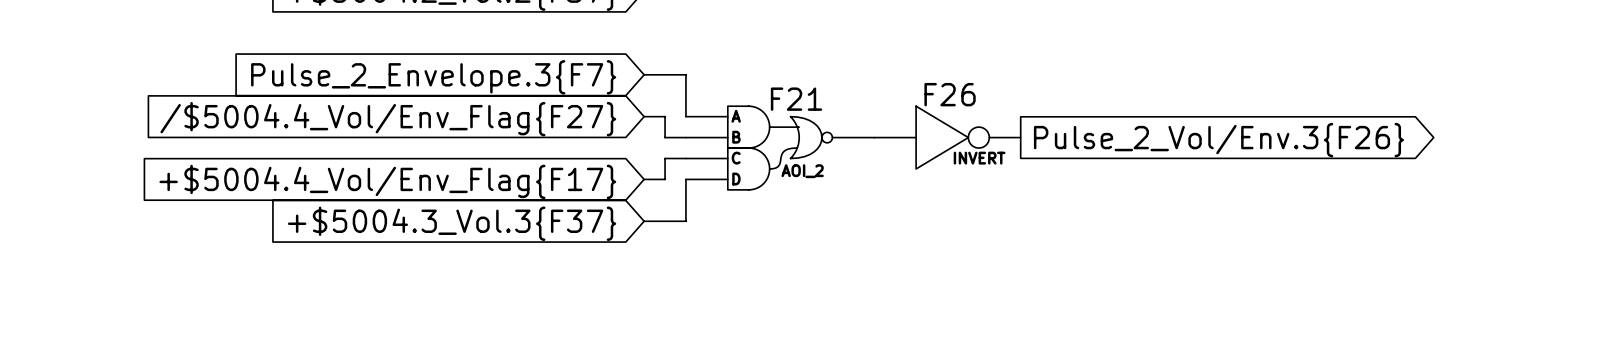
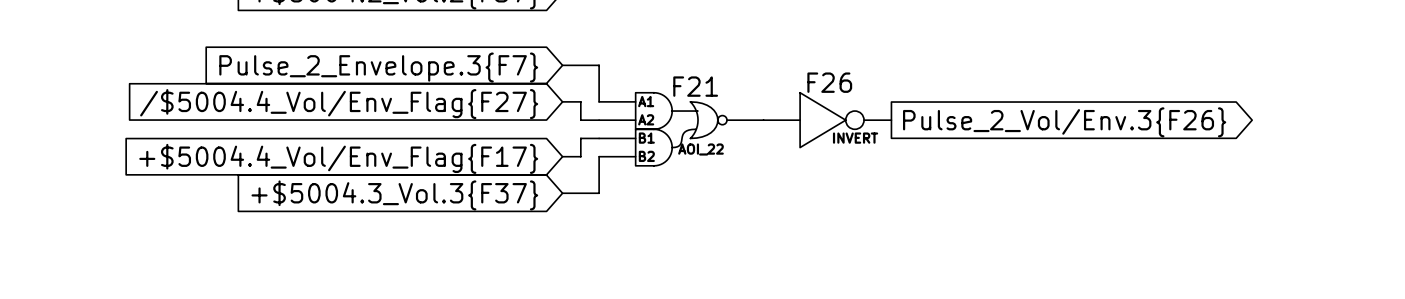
F21 text: A (736, 116) -> none
F21 text: none -> A1 (646, 101)
F21 text: B (736, 137) -> none
F21 text: none -> A2 (646, 119)
F21 text: C (736, 158) -> none
F21 text: none -> B1 (646, 138)
F21 value: AOI_2 (802, 171) -> AOI_22 (700, 149)
F21 text: D (736, 179) -> none
F21 text: none -> B2 (646, 156)

